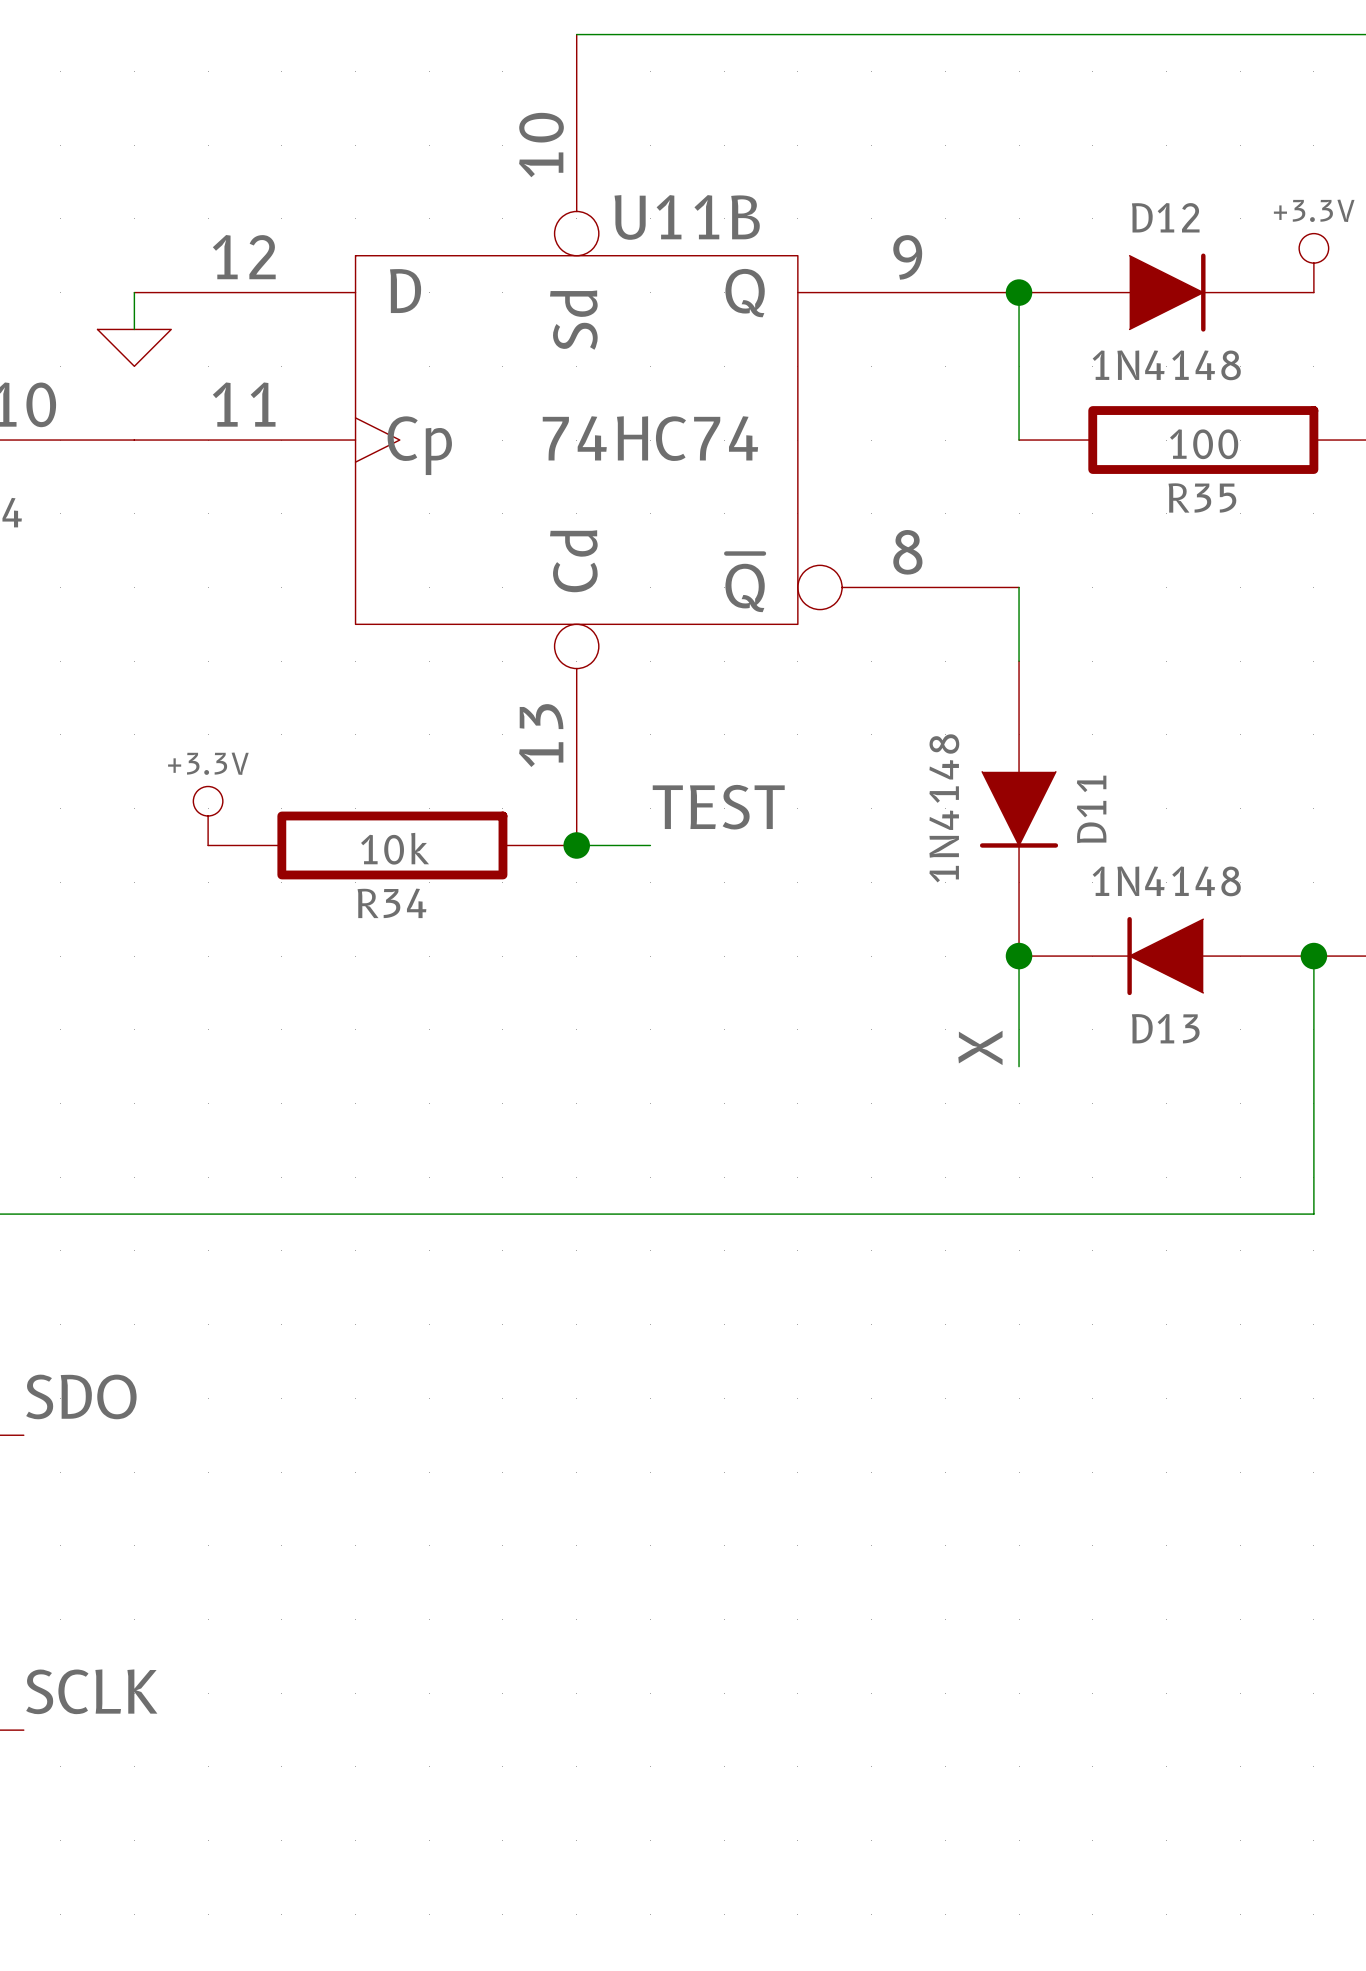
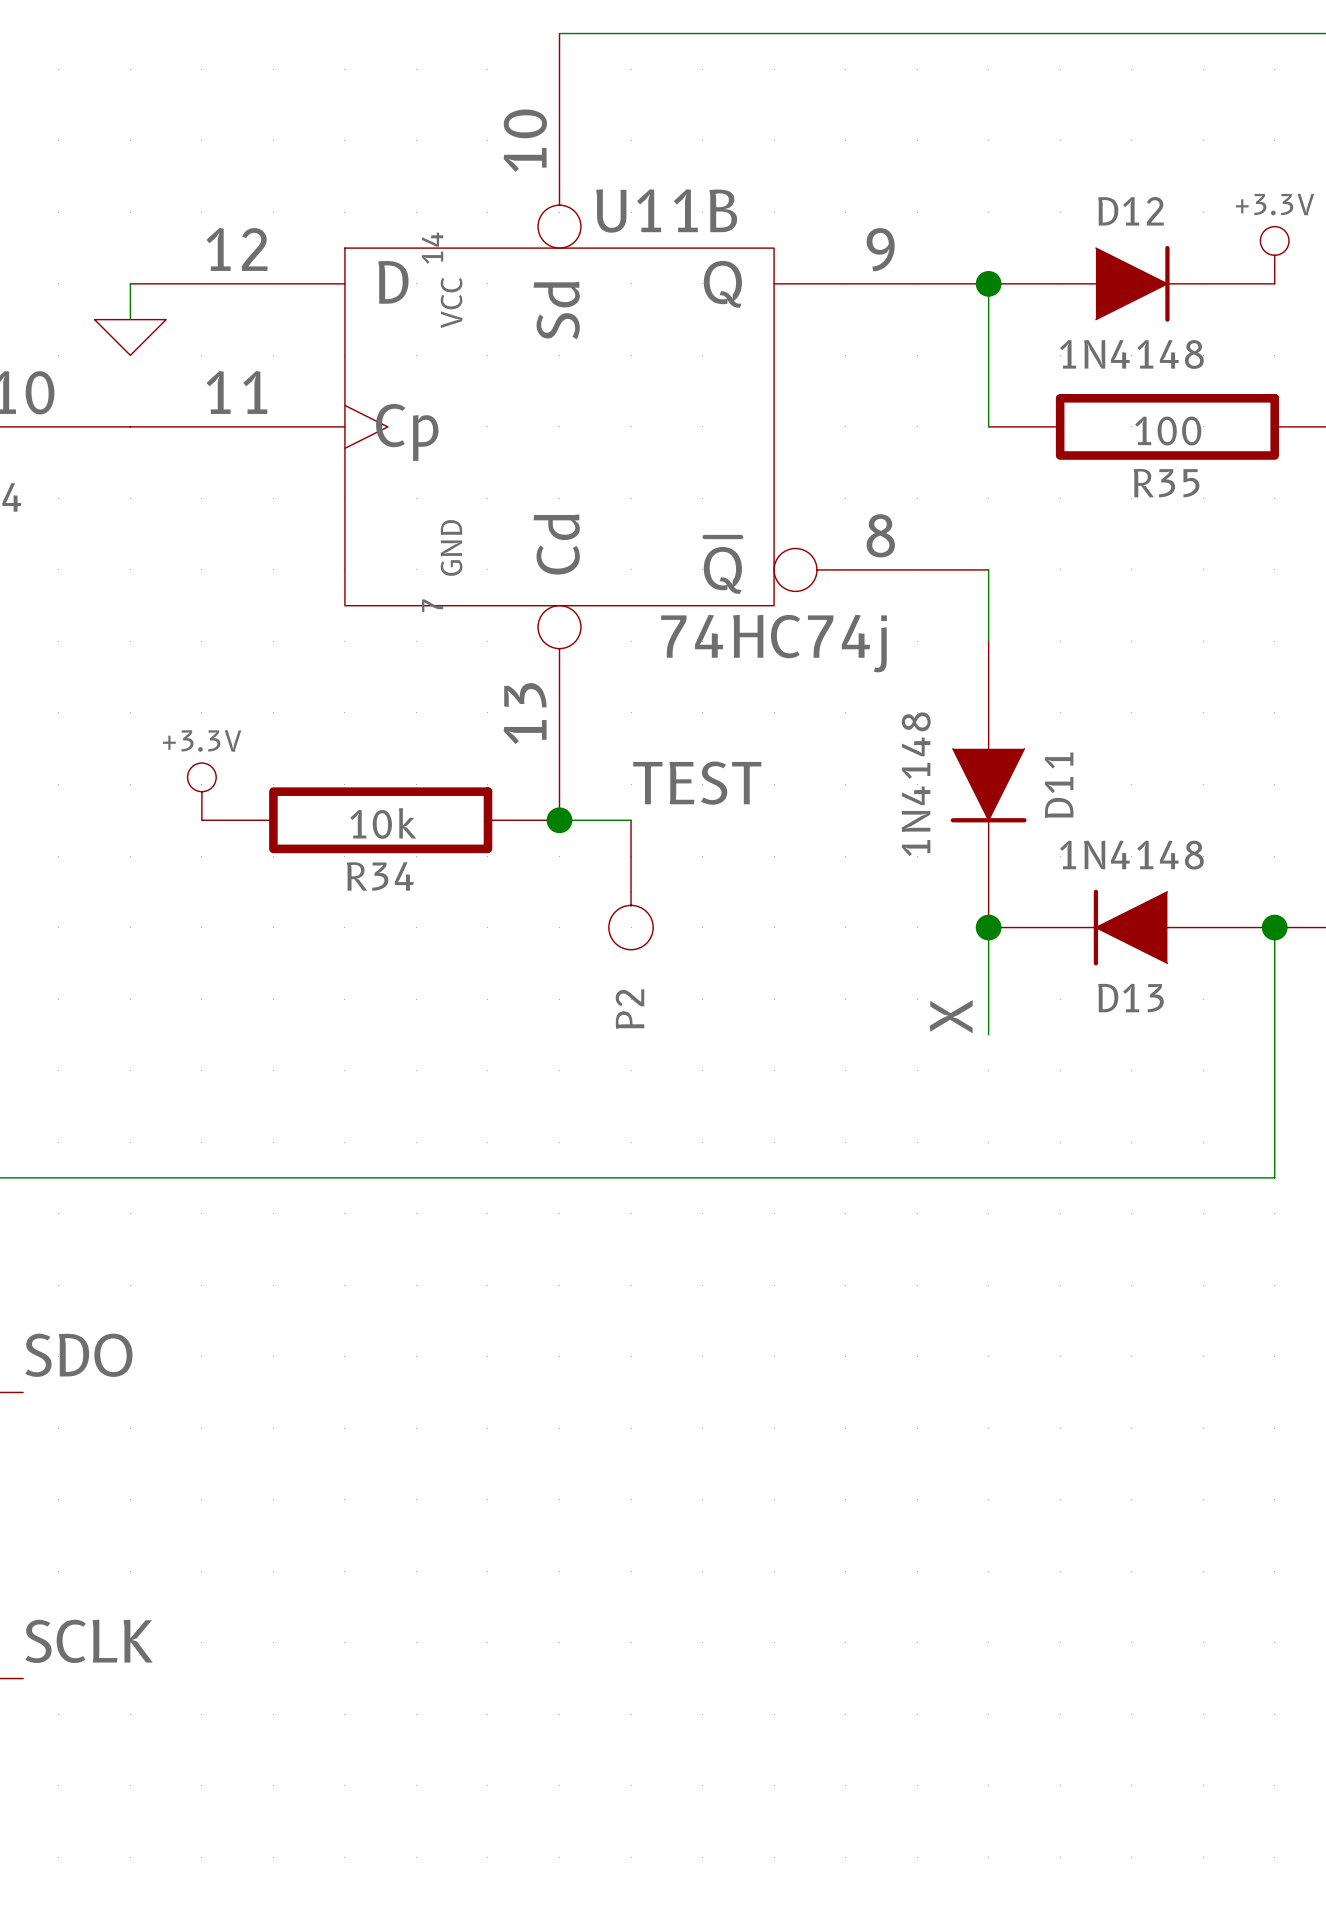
U11B pin number: none -> 14 (432, 248)
U11B pin name: none -> VCC (451, 302)
U11B value: 74HC74 (650, 438) -> 74HC74j (774, 643)
U11B pin name: none -> GND (451, 547)
U11B pin number: none -> 7 (432, 605)
P2: none -> (631, 884)

